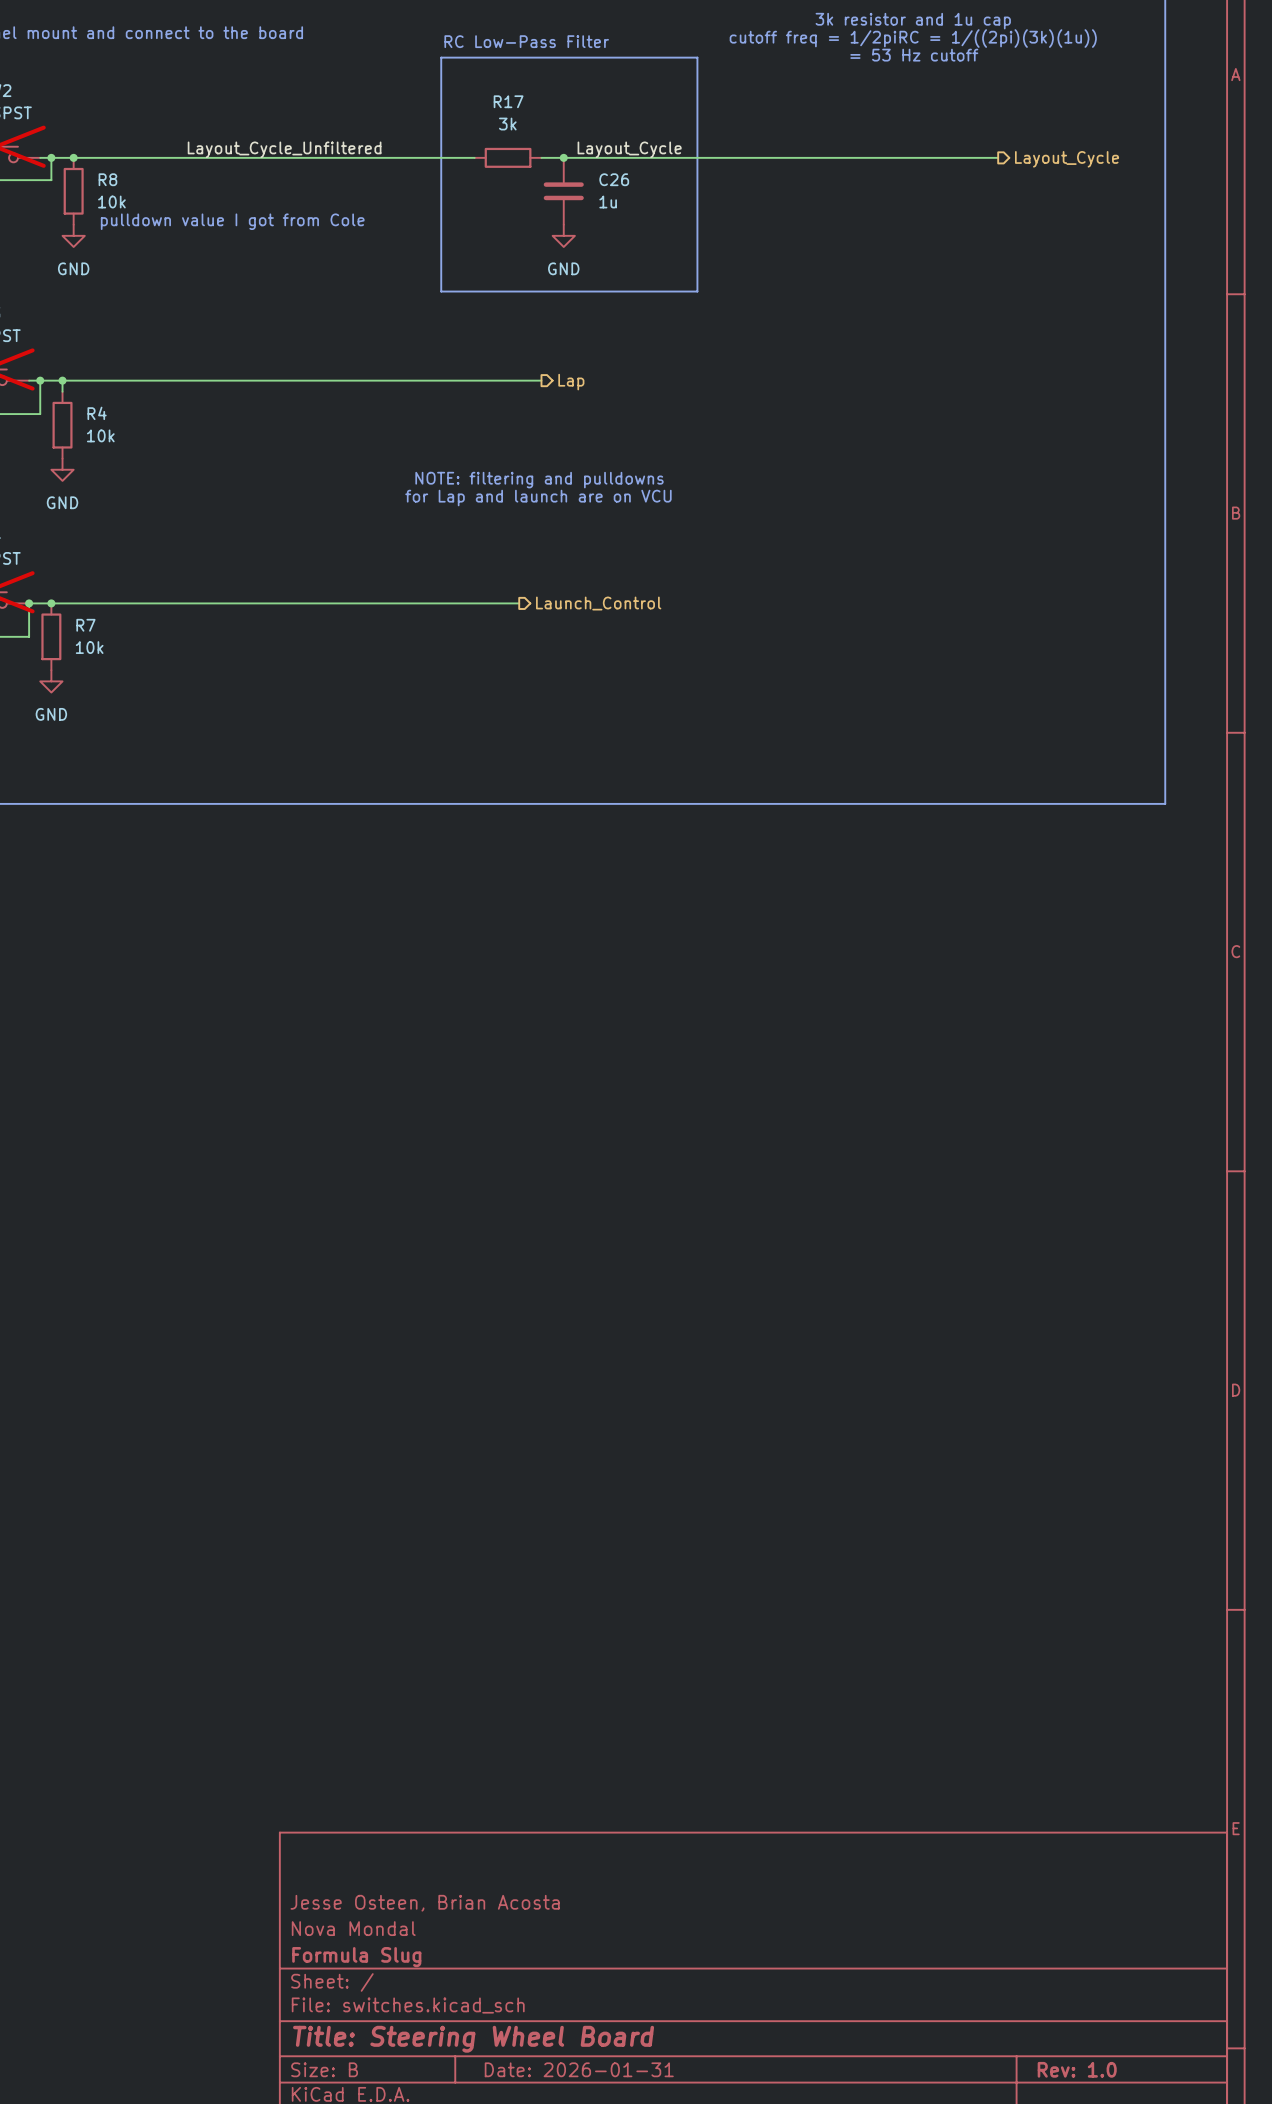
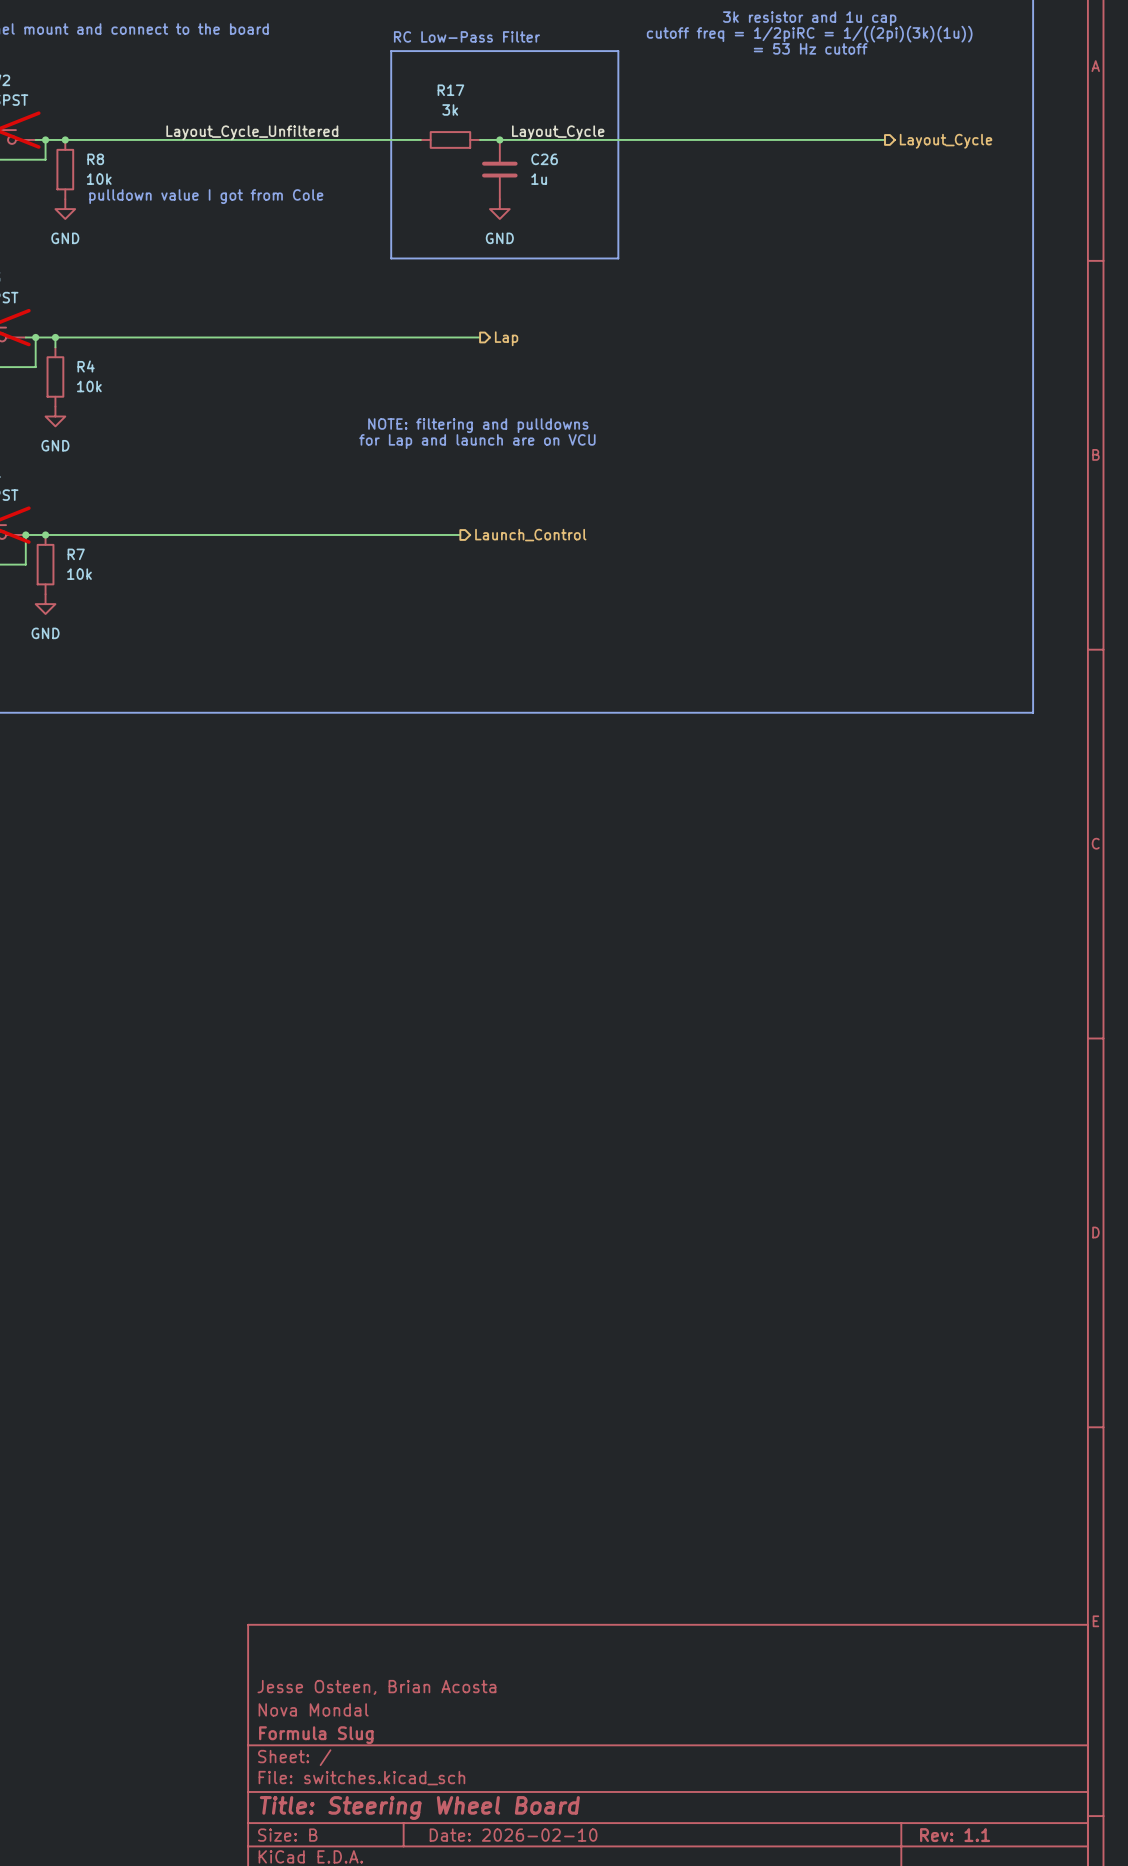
title block: Date: 2026-01-31 (579, 2069) -> Date: 2026-02-10 (513, 1835)
title block: Rev: 1.0 (1077, 2069) -> Rev: 1.1 (955, 1835)

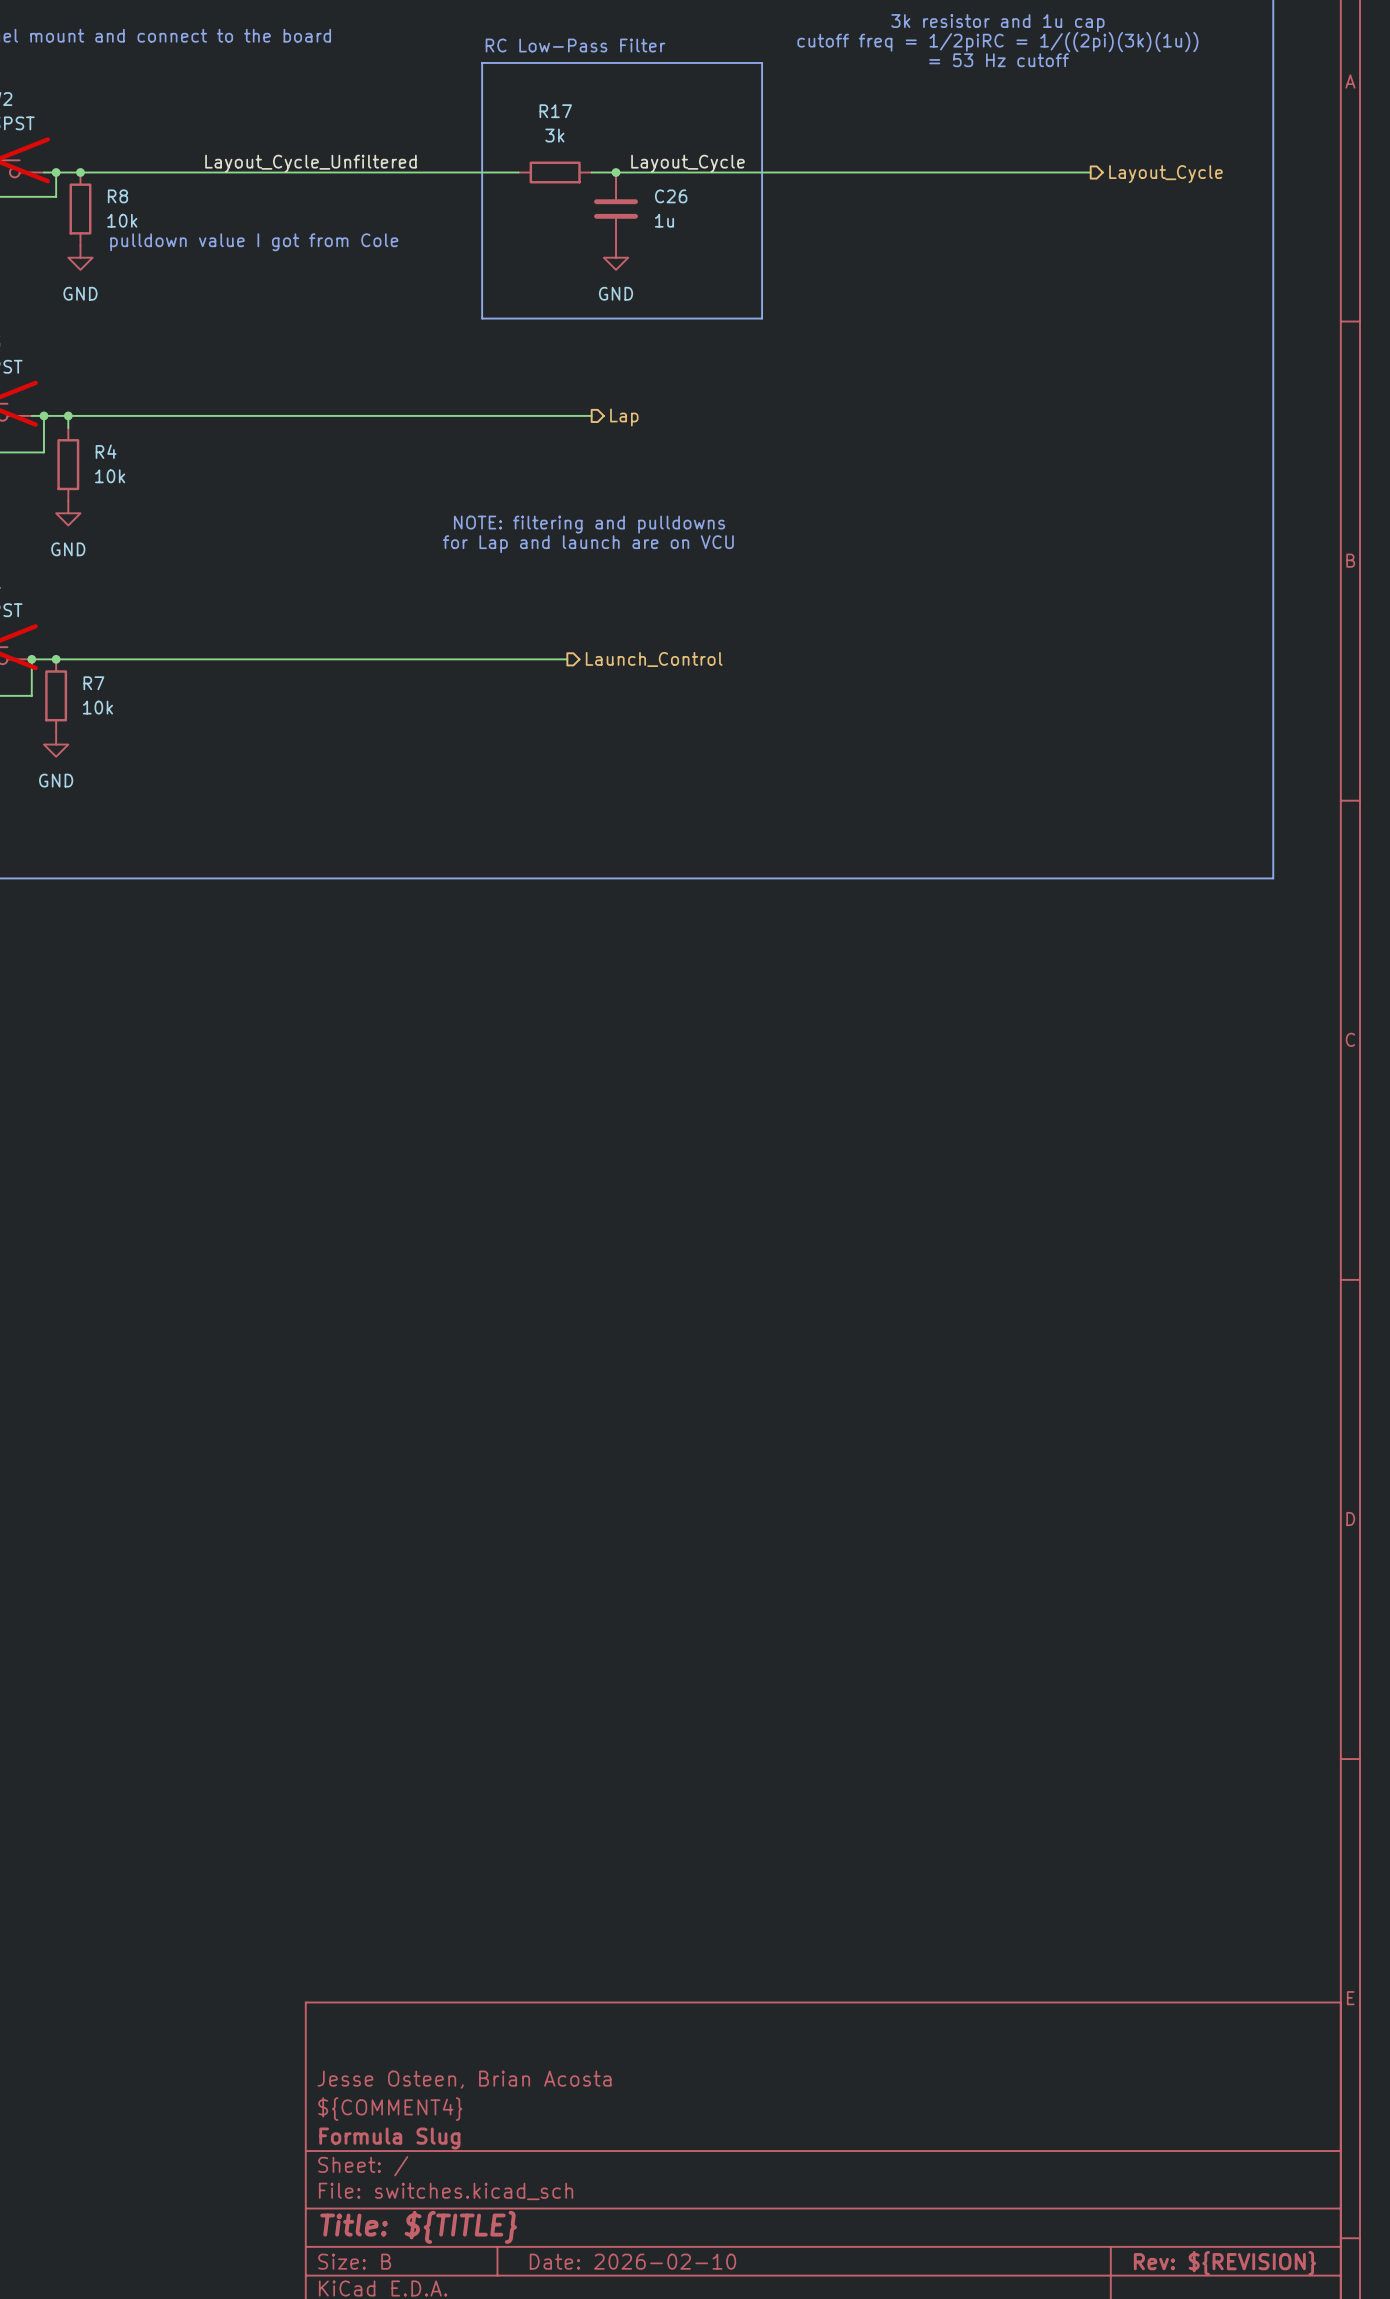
title block: Nova Mondal (313, 1709) -> ${COMMENT4} (390, 2109)
title block: Title: Steering Wheel Board (419, 1807) -> Title: ${TITLE} (418, 2227)
title block: Rev: 1.1 (955, 1835) -> Rev: ${REVISION} (1224, 2263)

